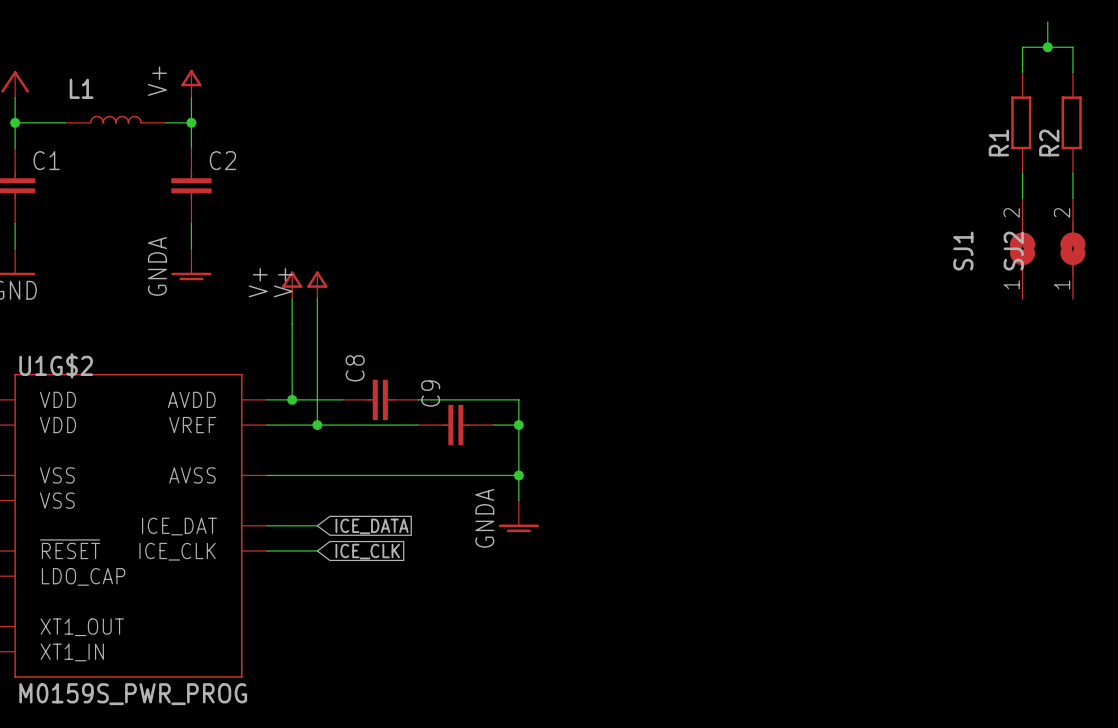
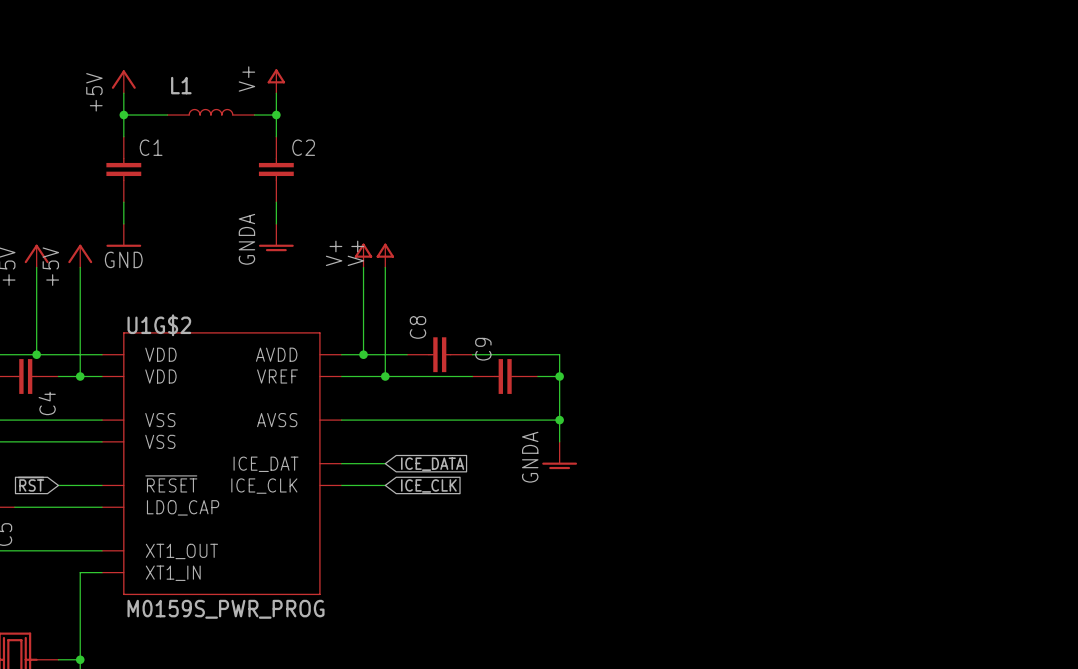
wire: (1047, 22) (1047, 47) -> none
junction: (1047, 47) -> none
wire: (1022, 72) (1022, 47) (1072, 47) (1072, 72) -> none
R1: (1021, 122) -> none
R2: (1071, 122) -> none
wire: (1022, 173) (1022, 198) -> none
wire: (1072, 173) (1072, 198) -> none
SJ1: (1022, 248) -> none
SJ2: (1072, 248) -> none

